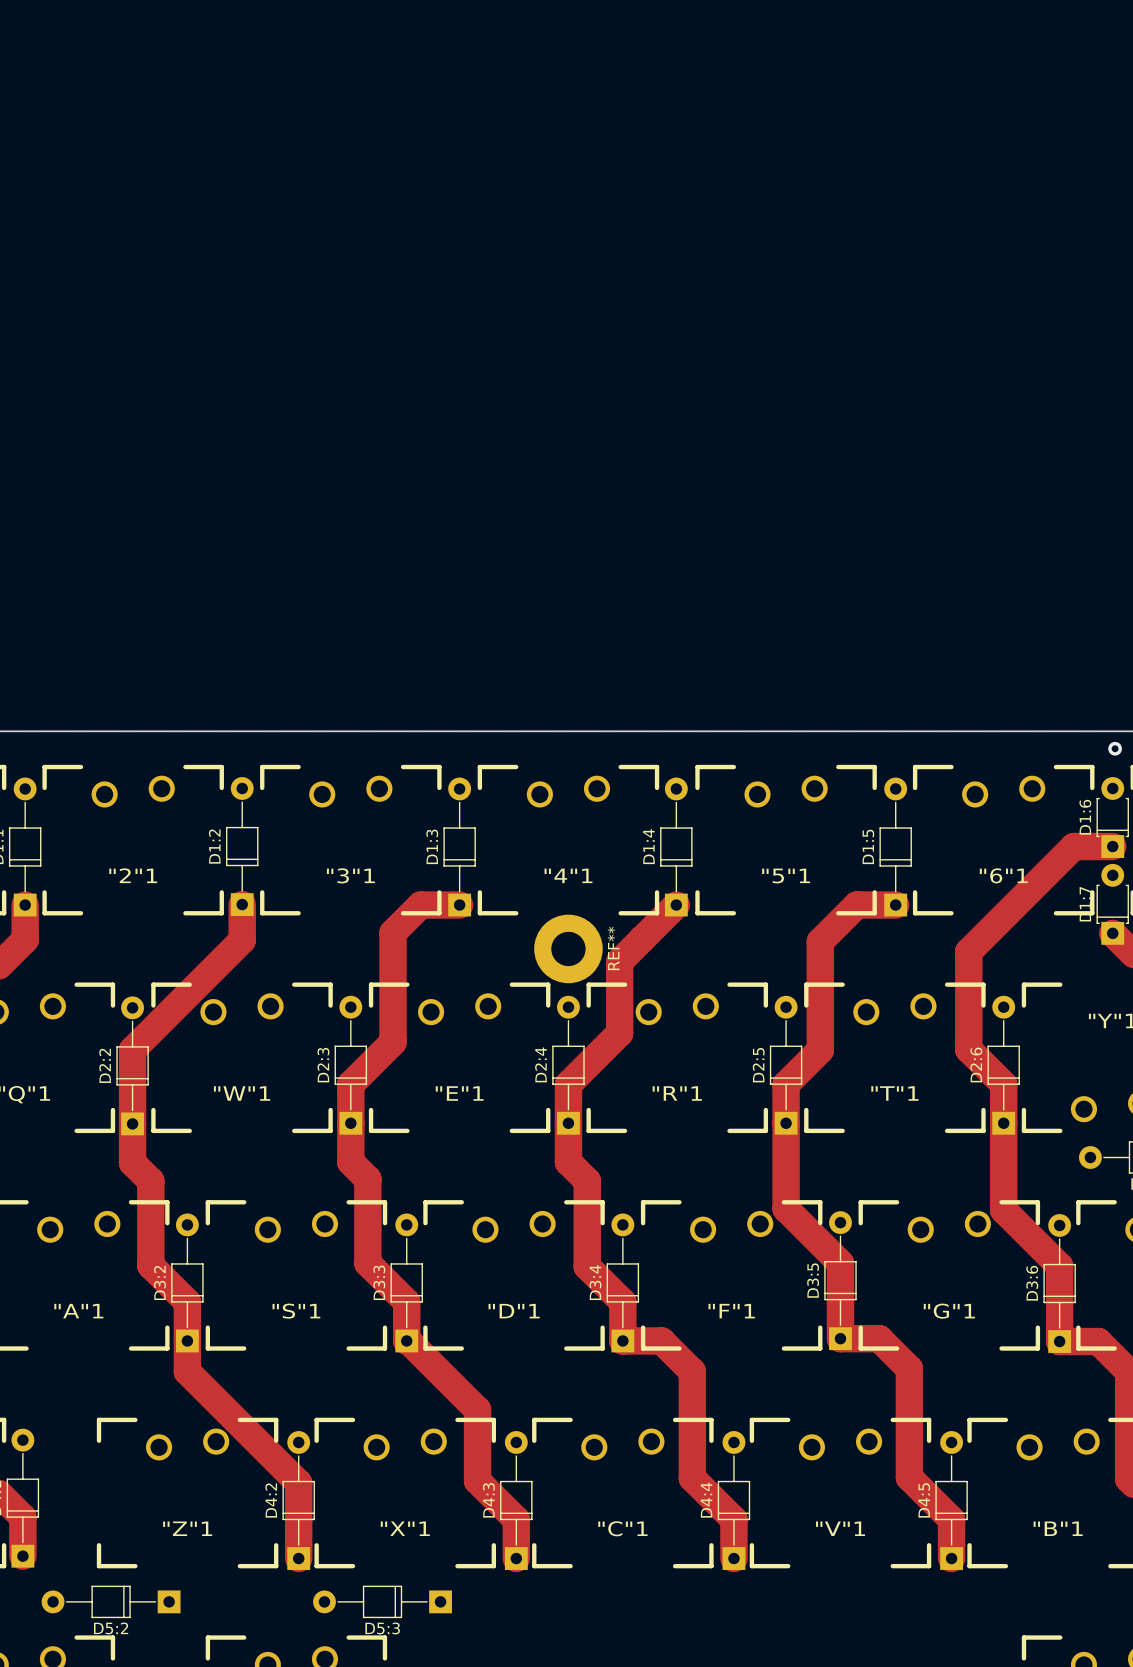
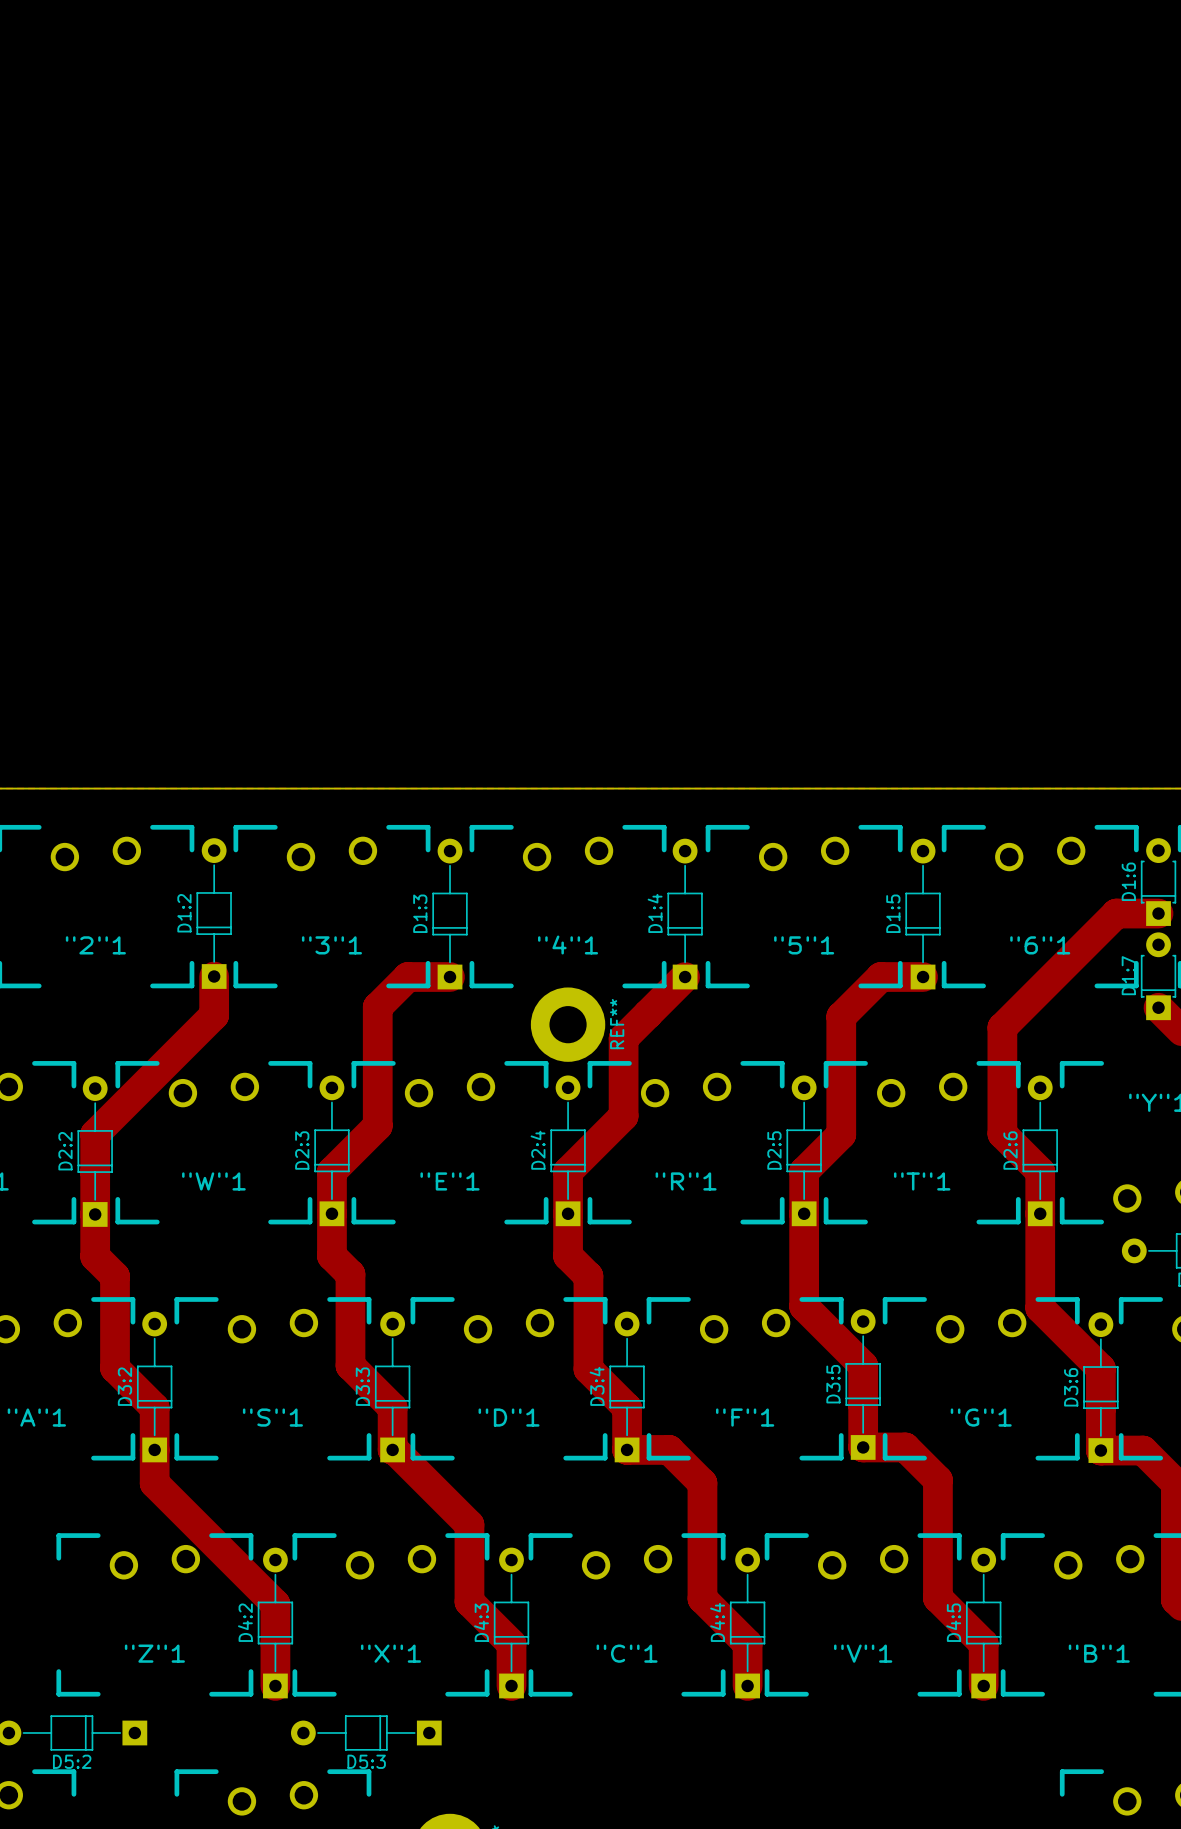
via: (1115, 748) -> none

